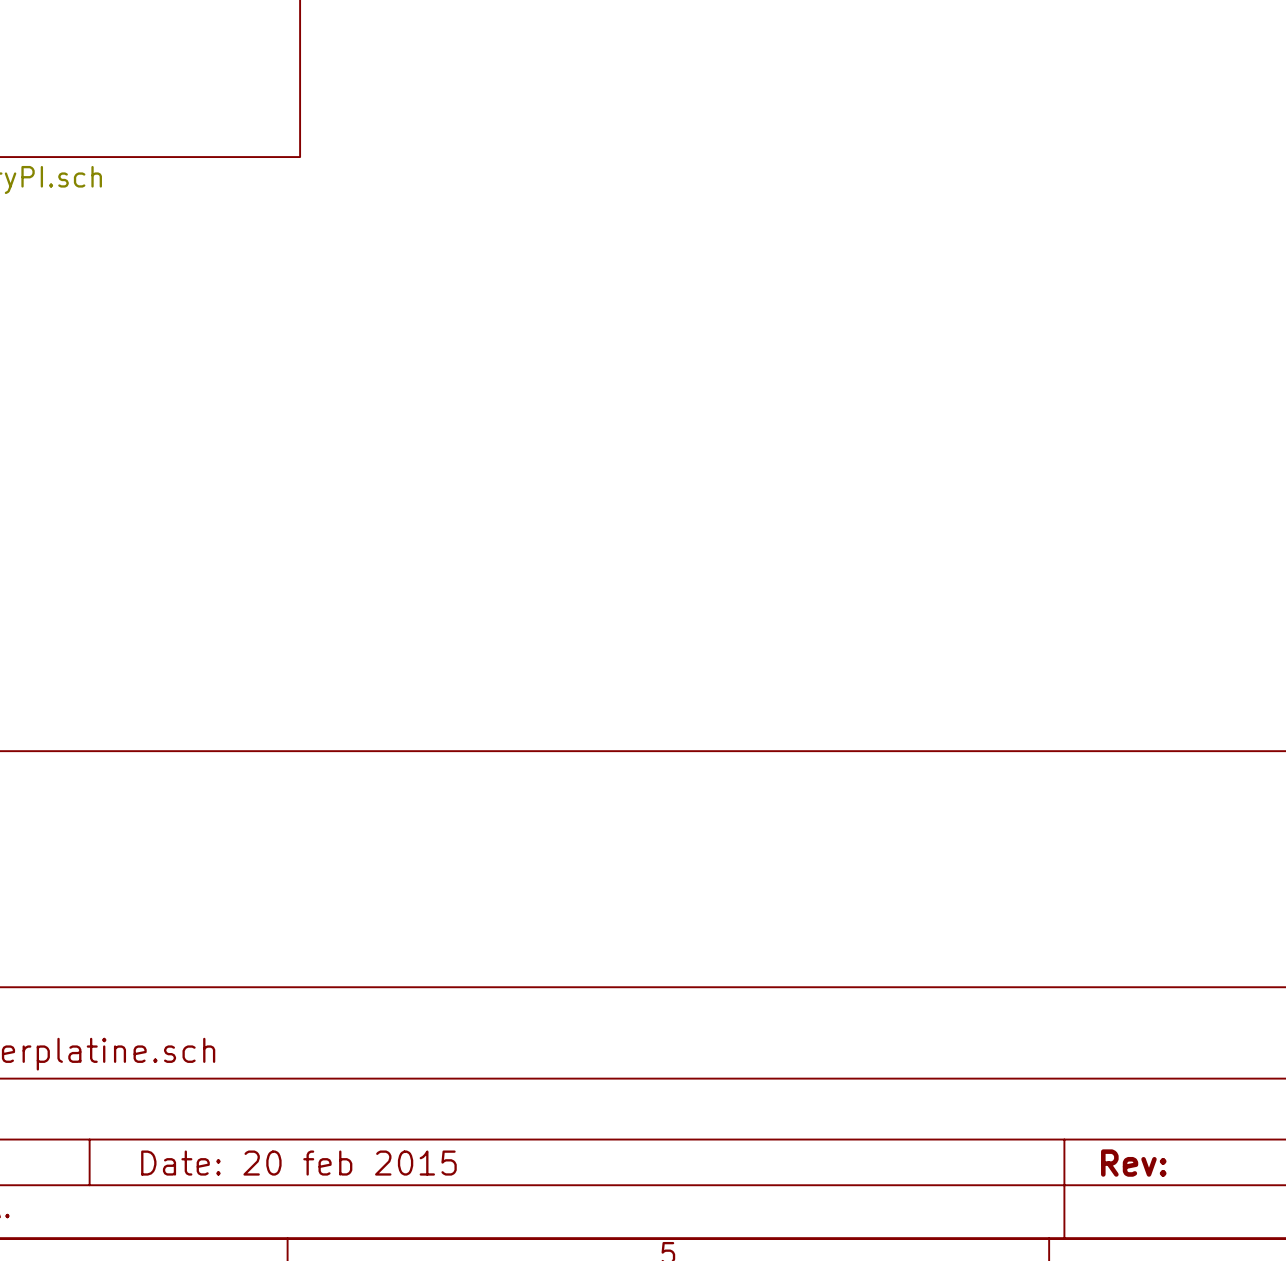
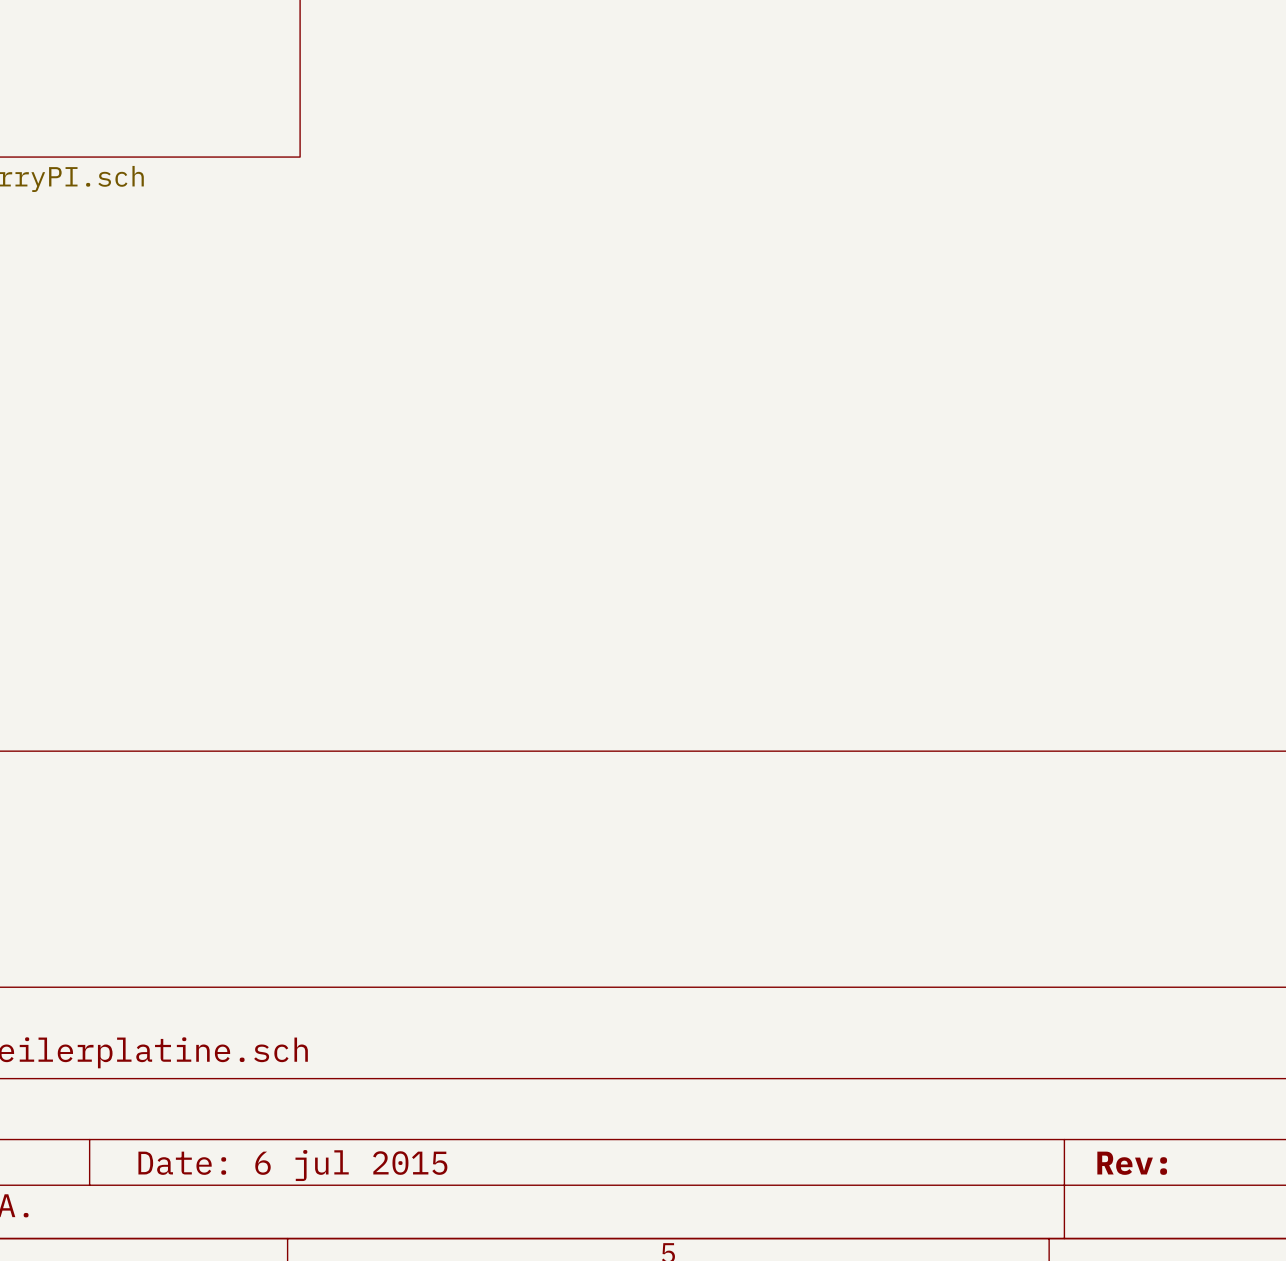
title block: Date: 20 feb 2015 (298, 1163) -> Date: 6 jul 2015 (292, 1165)

